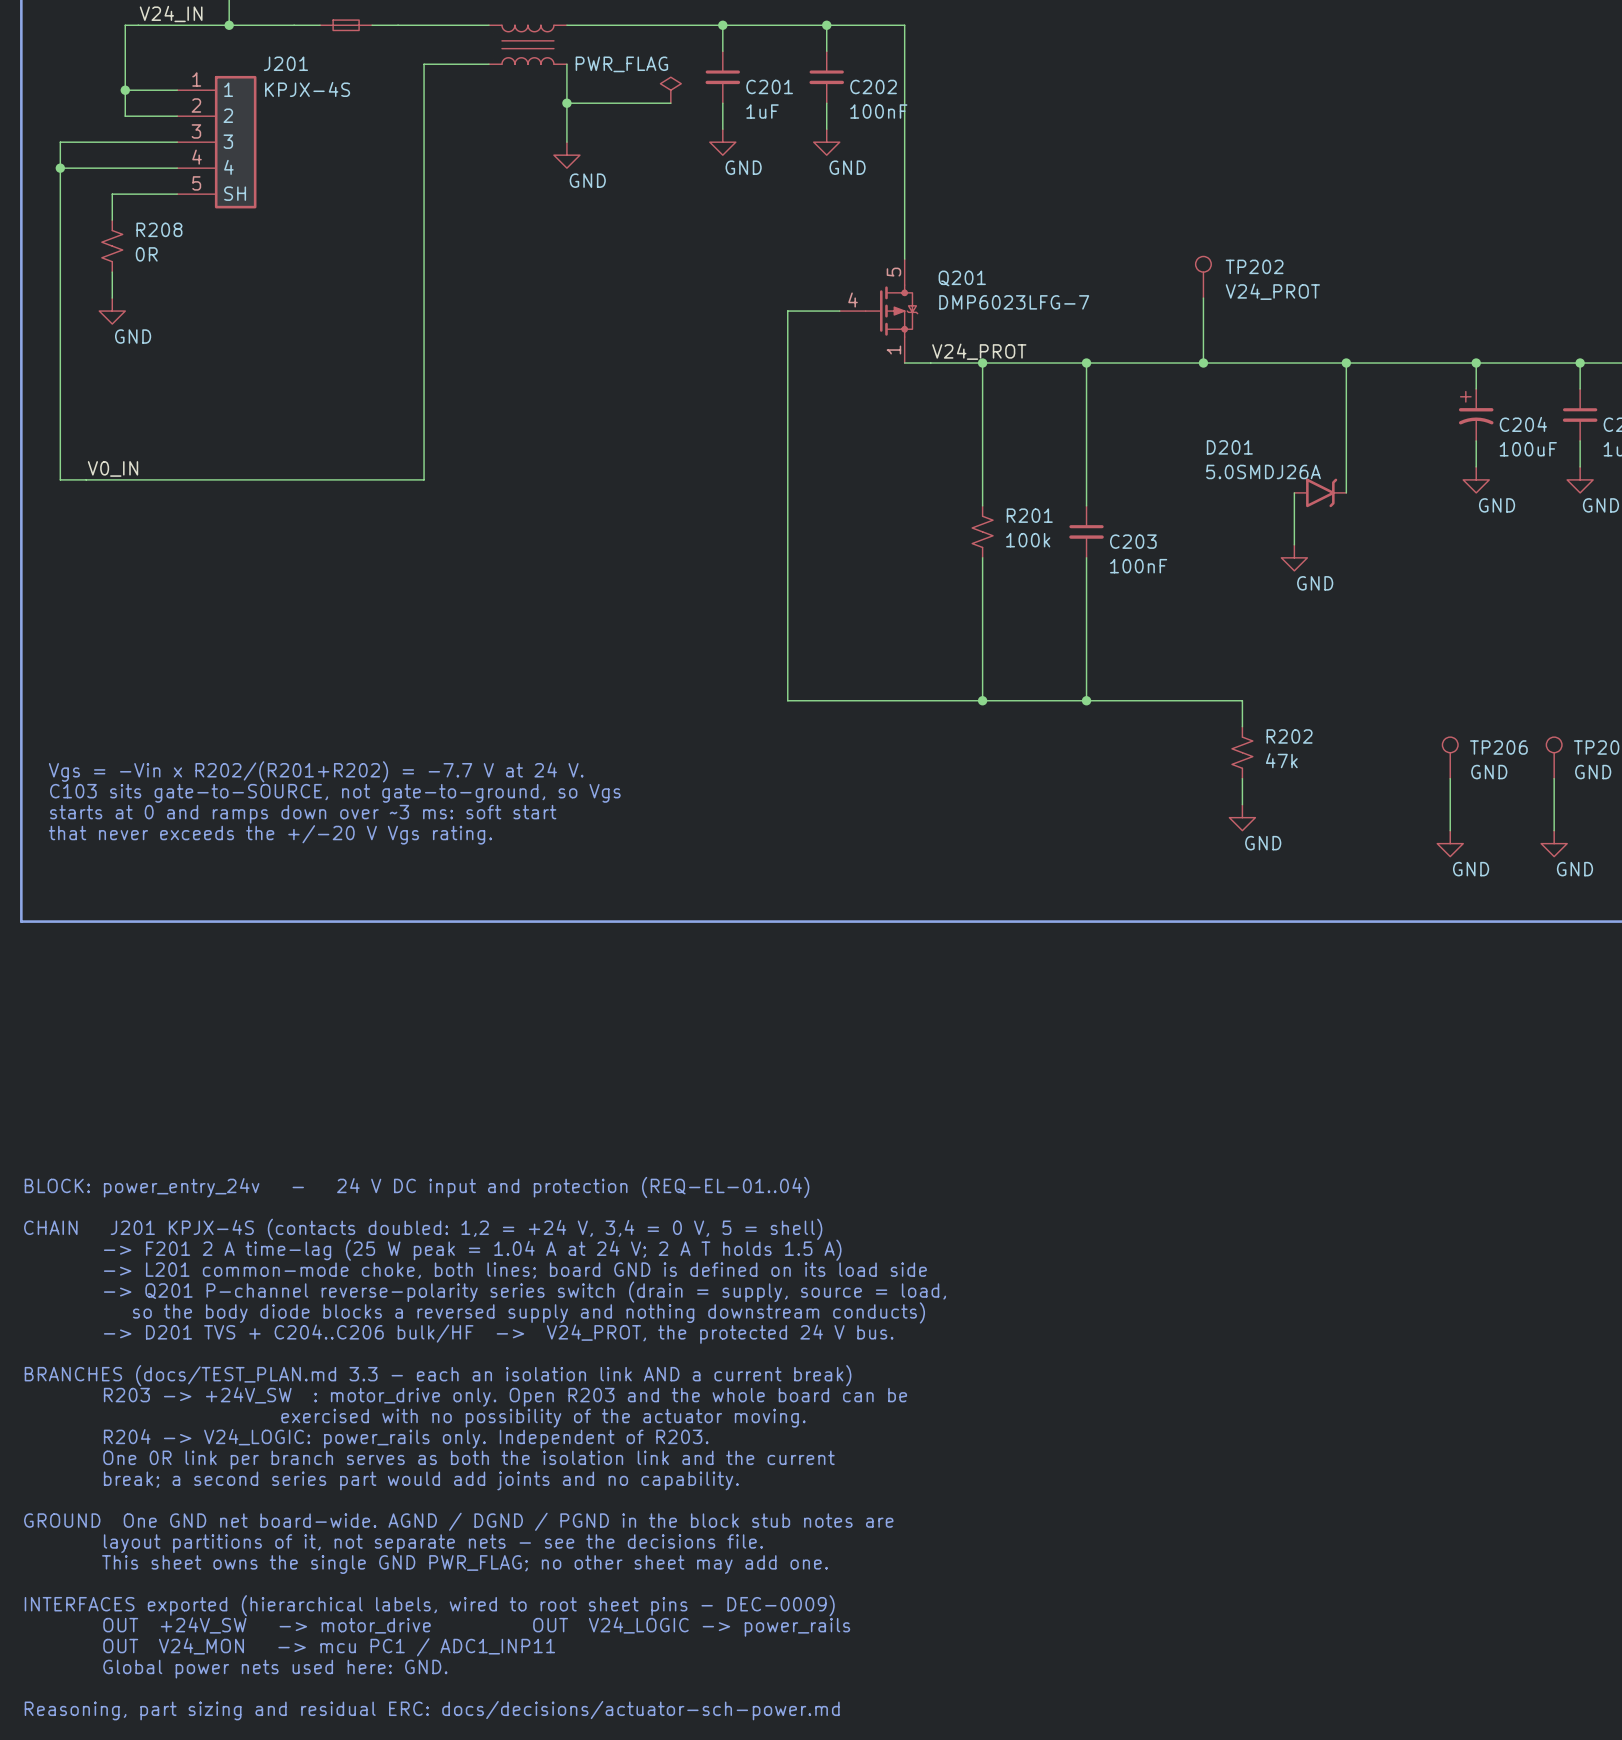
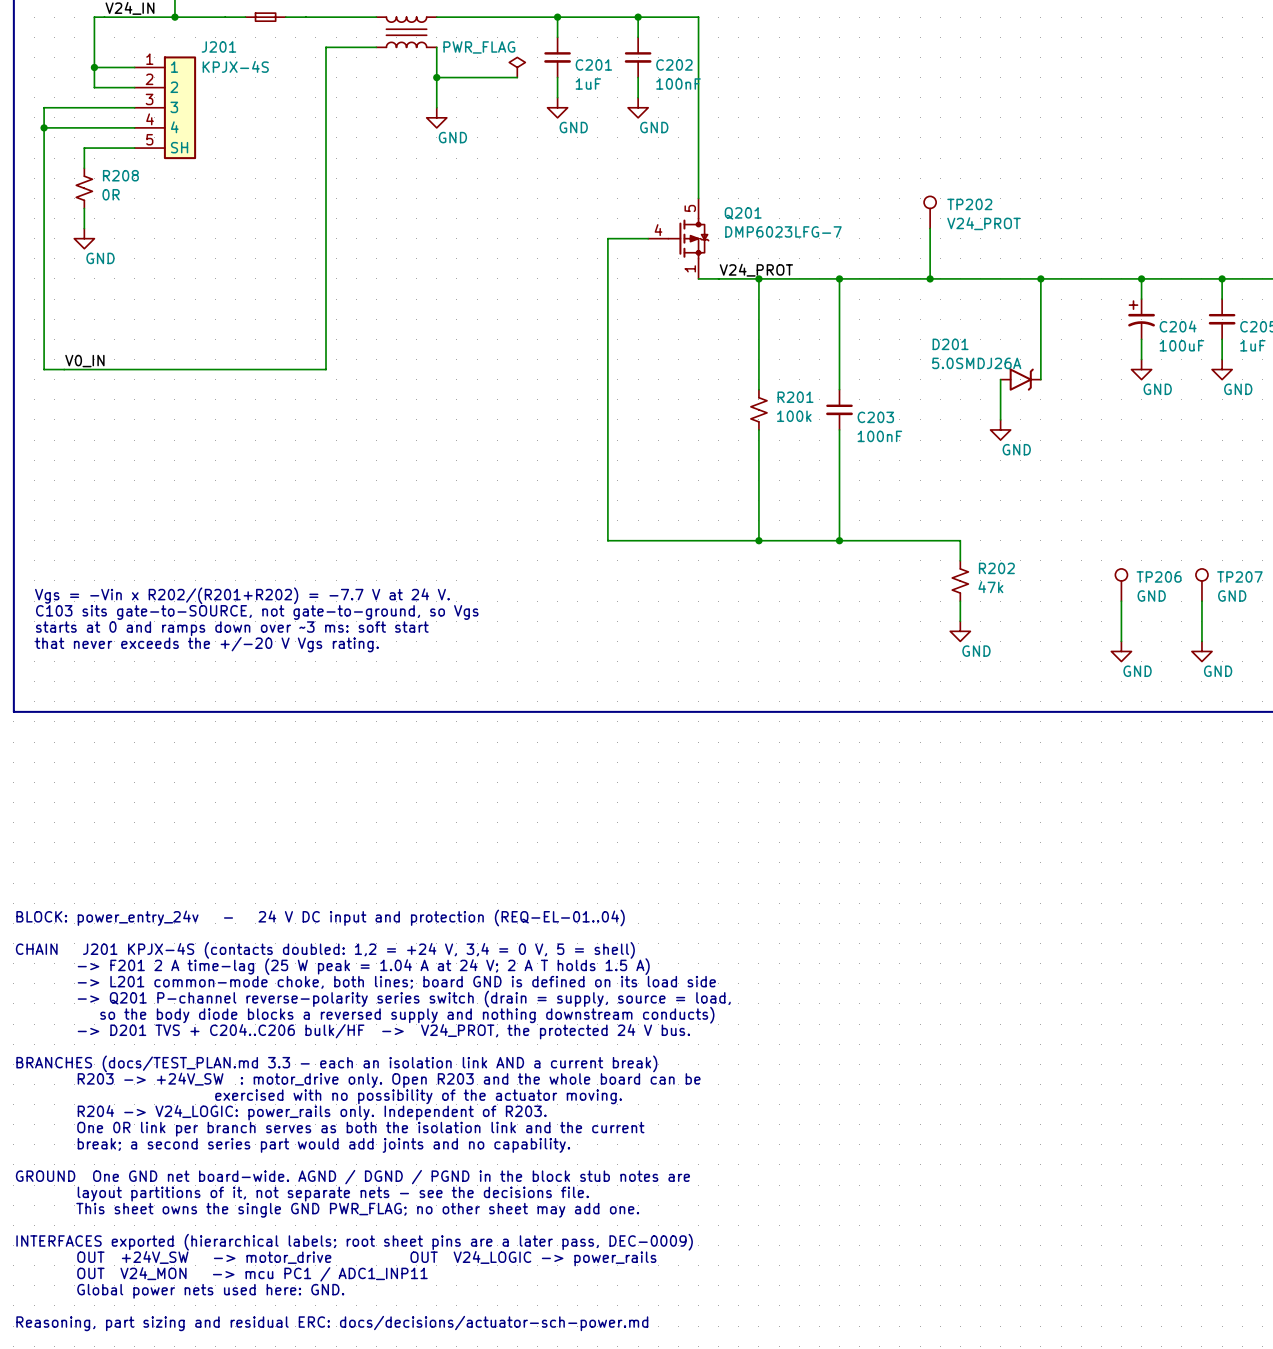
text: INTERFACES exported (hierarchical labels, wired to root sheet pins - DEC-0009) (429, 1605) -> INTERFACES exported (hierarchical labels; root sheet pins are a later pass, DEC-0009) (354, 1242)

